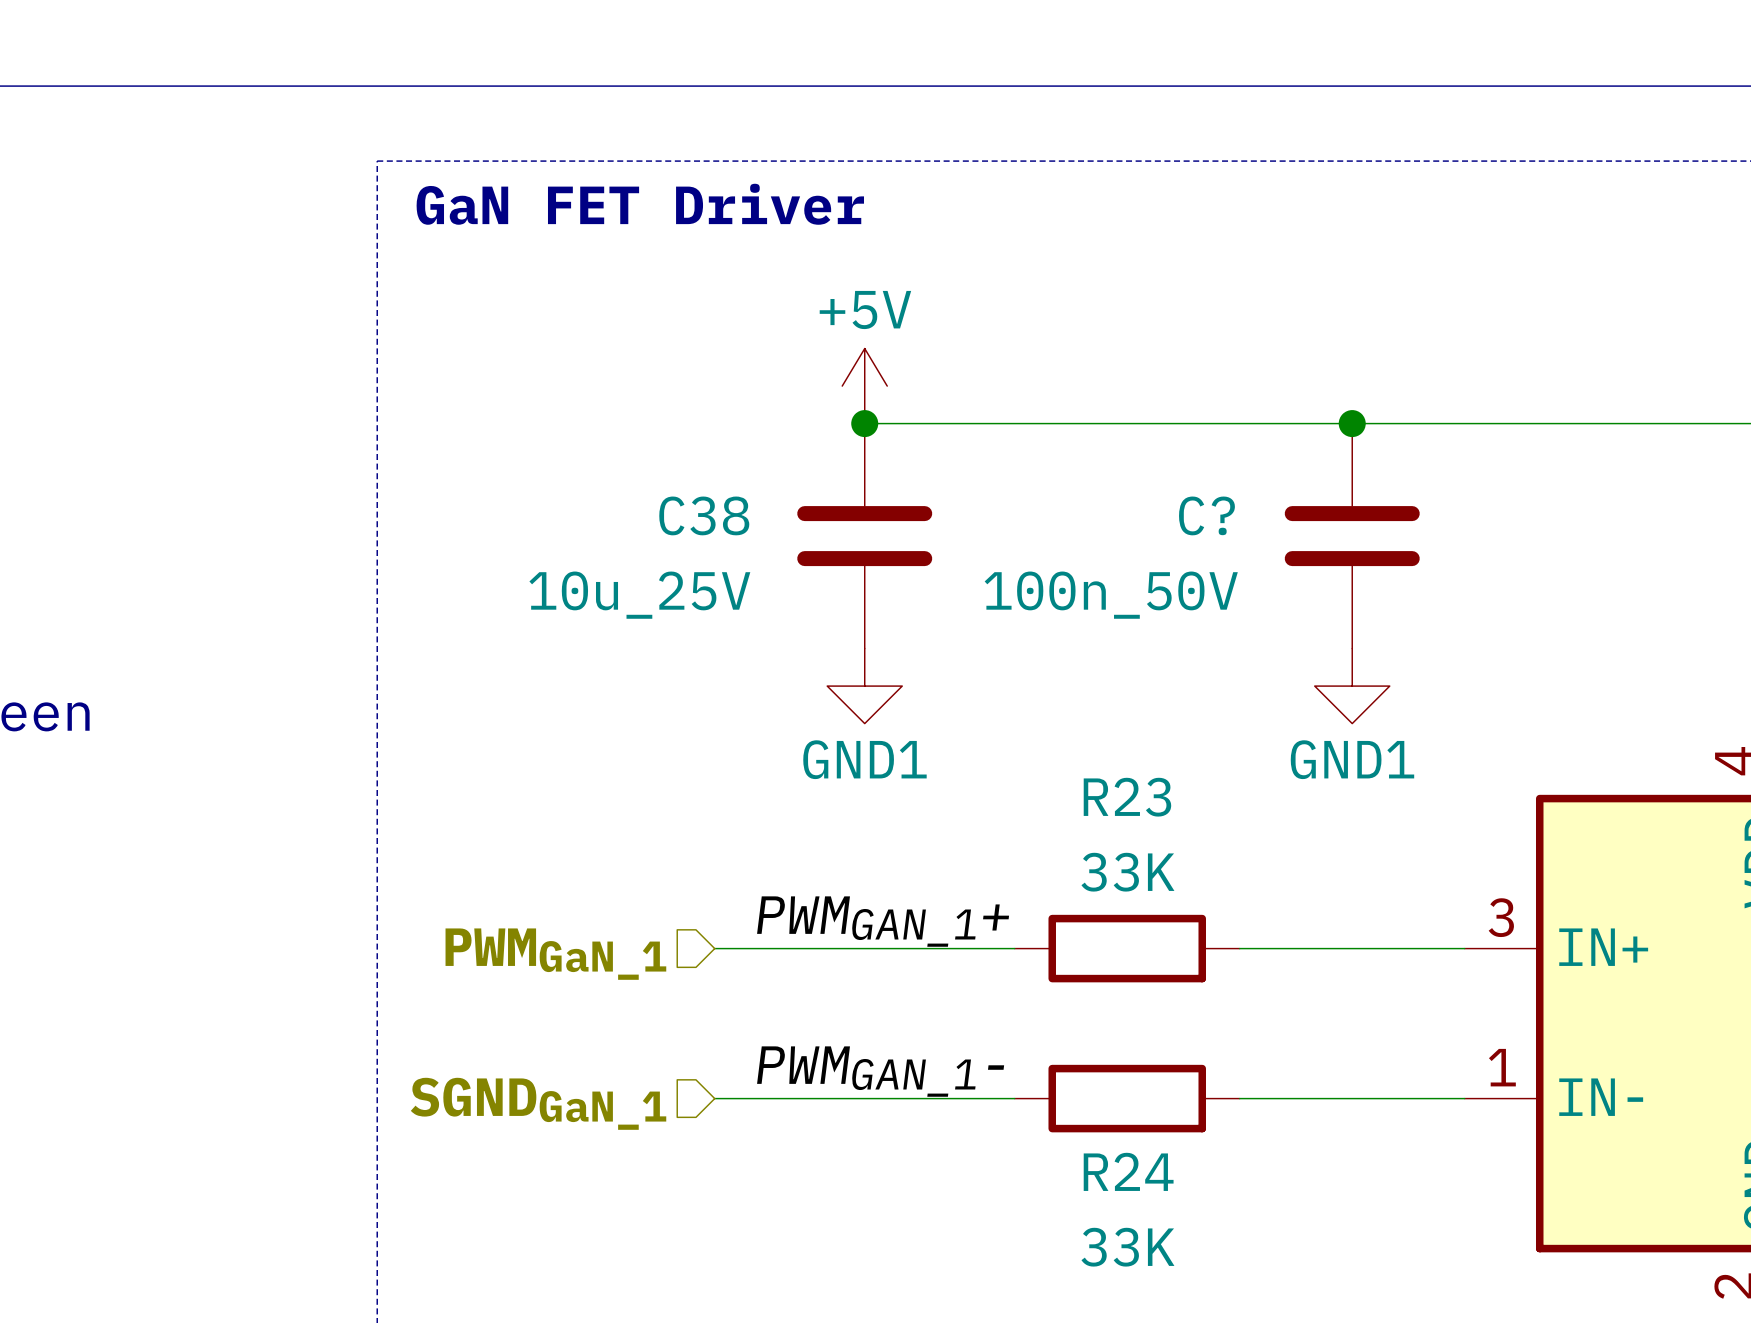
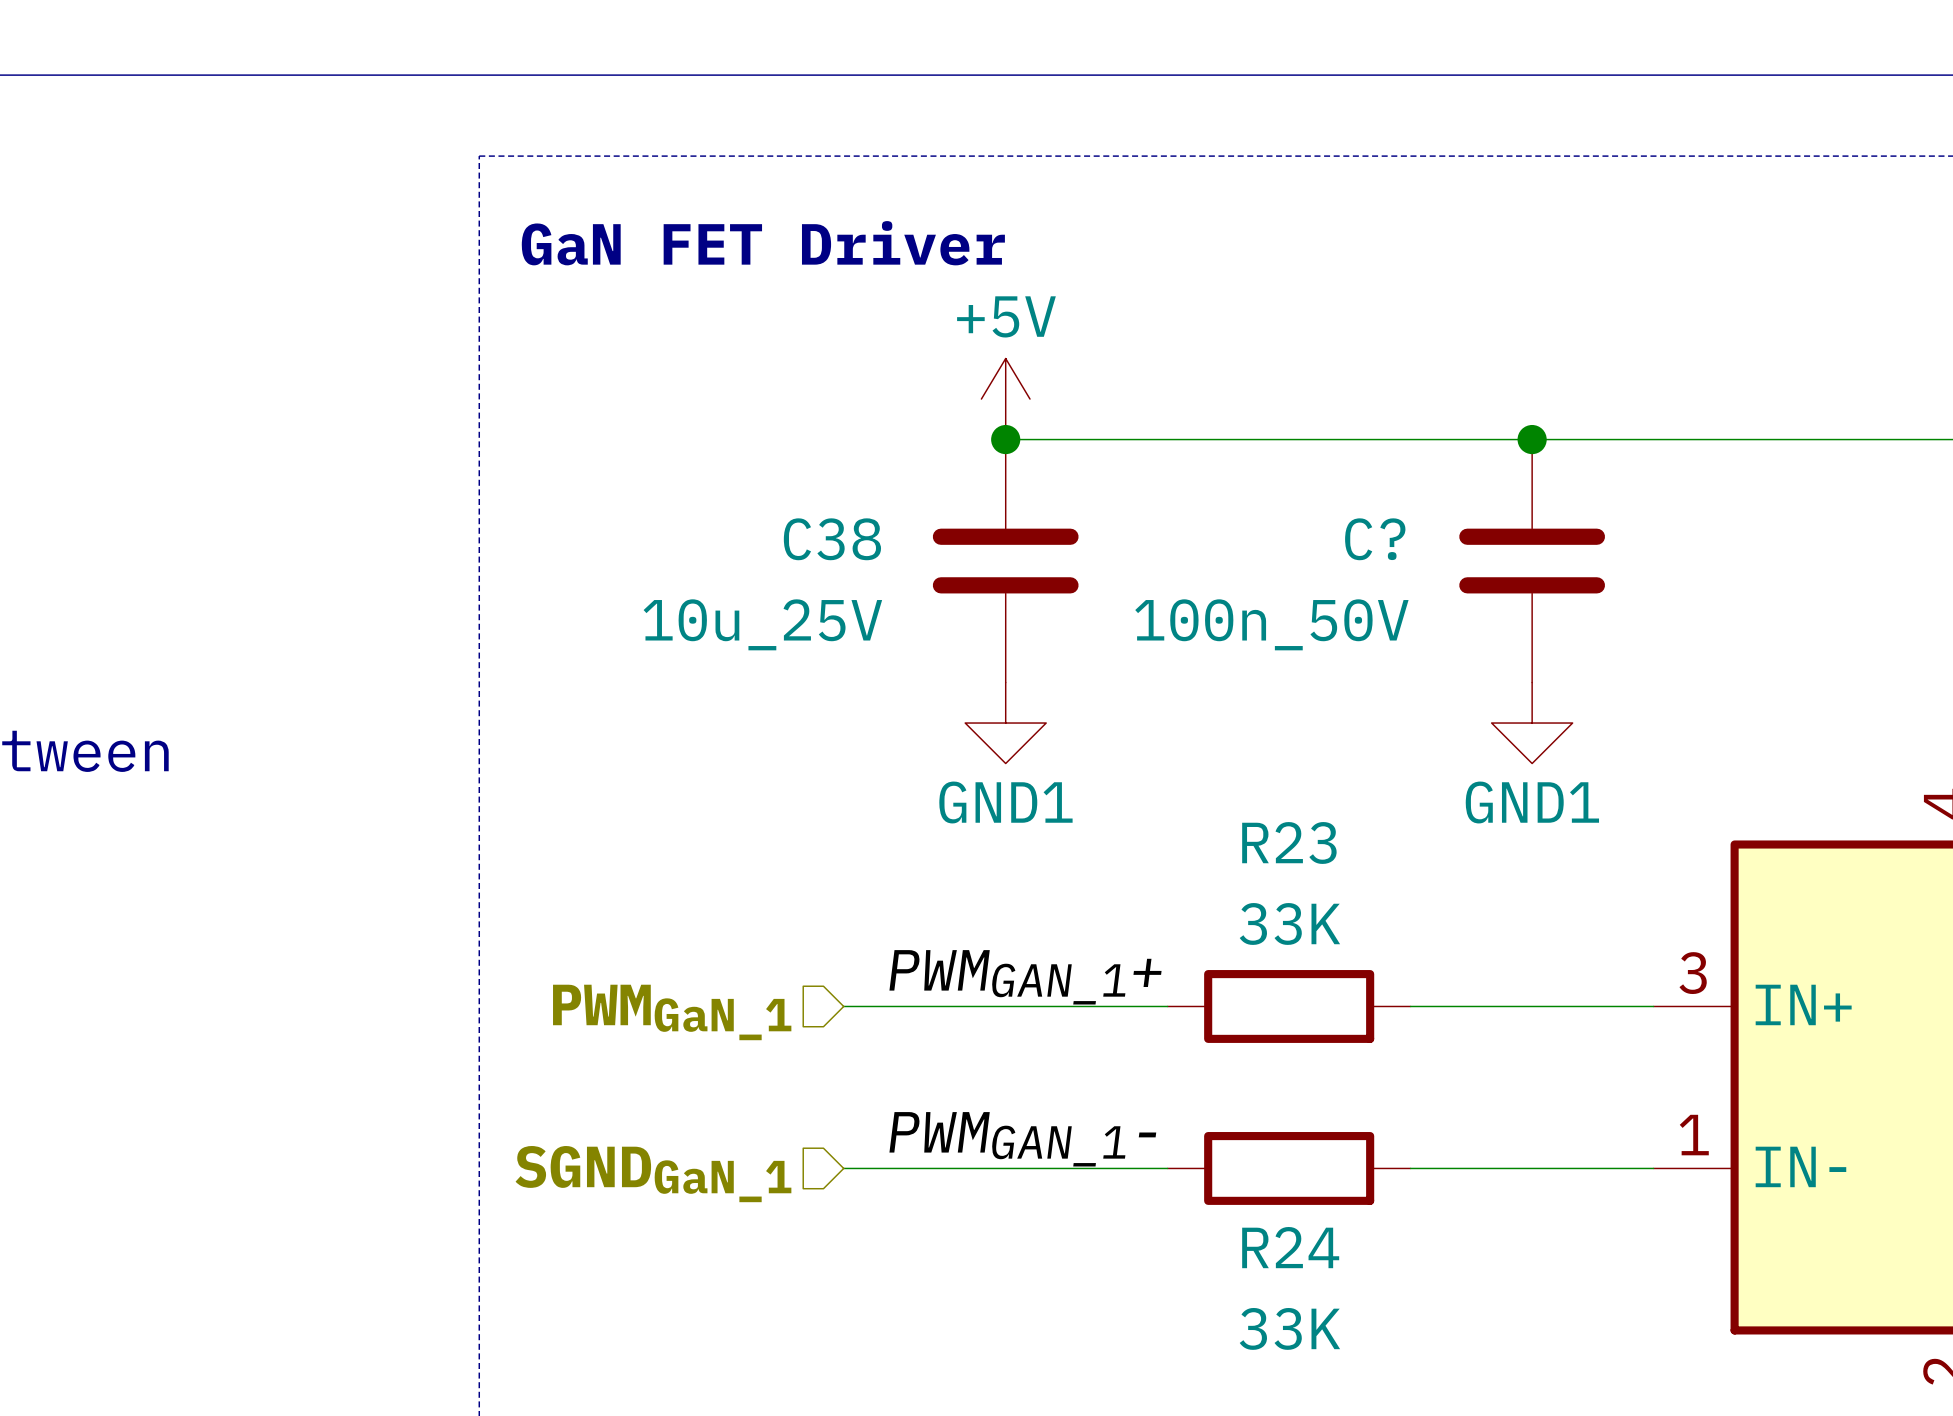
text position: GaN FET Driver (640, 204) -> GaN FET Driver (763, 243)

